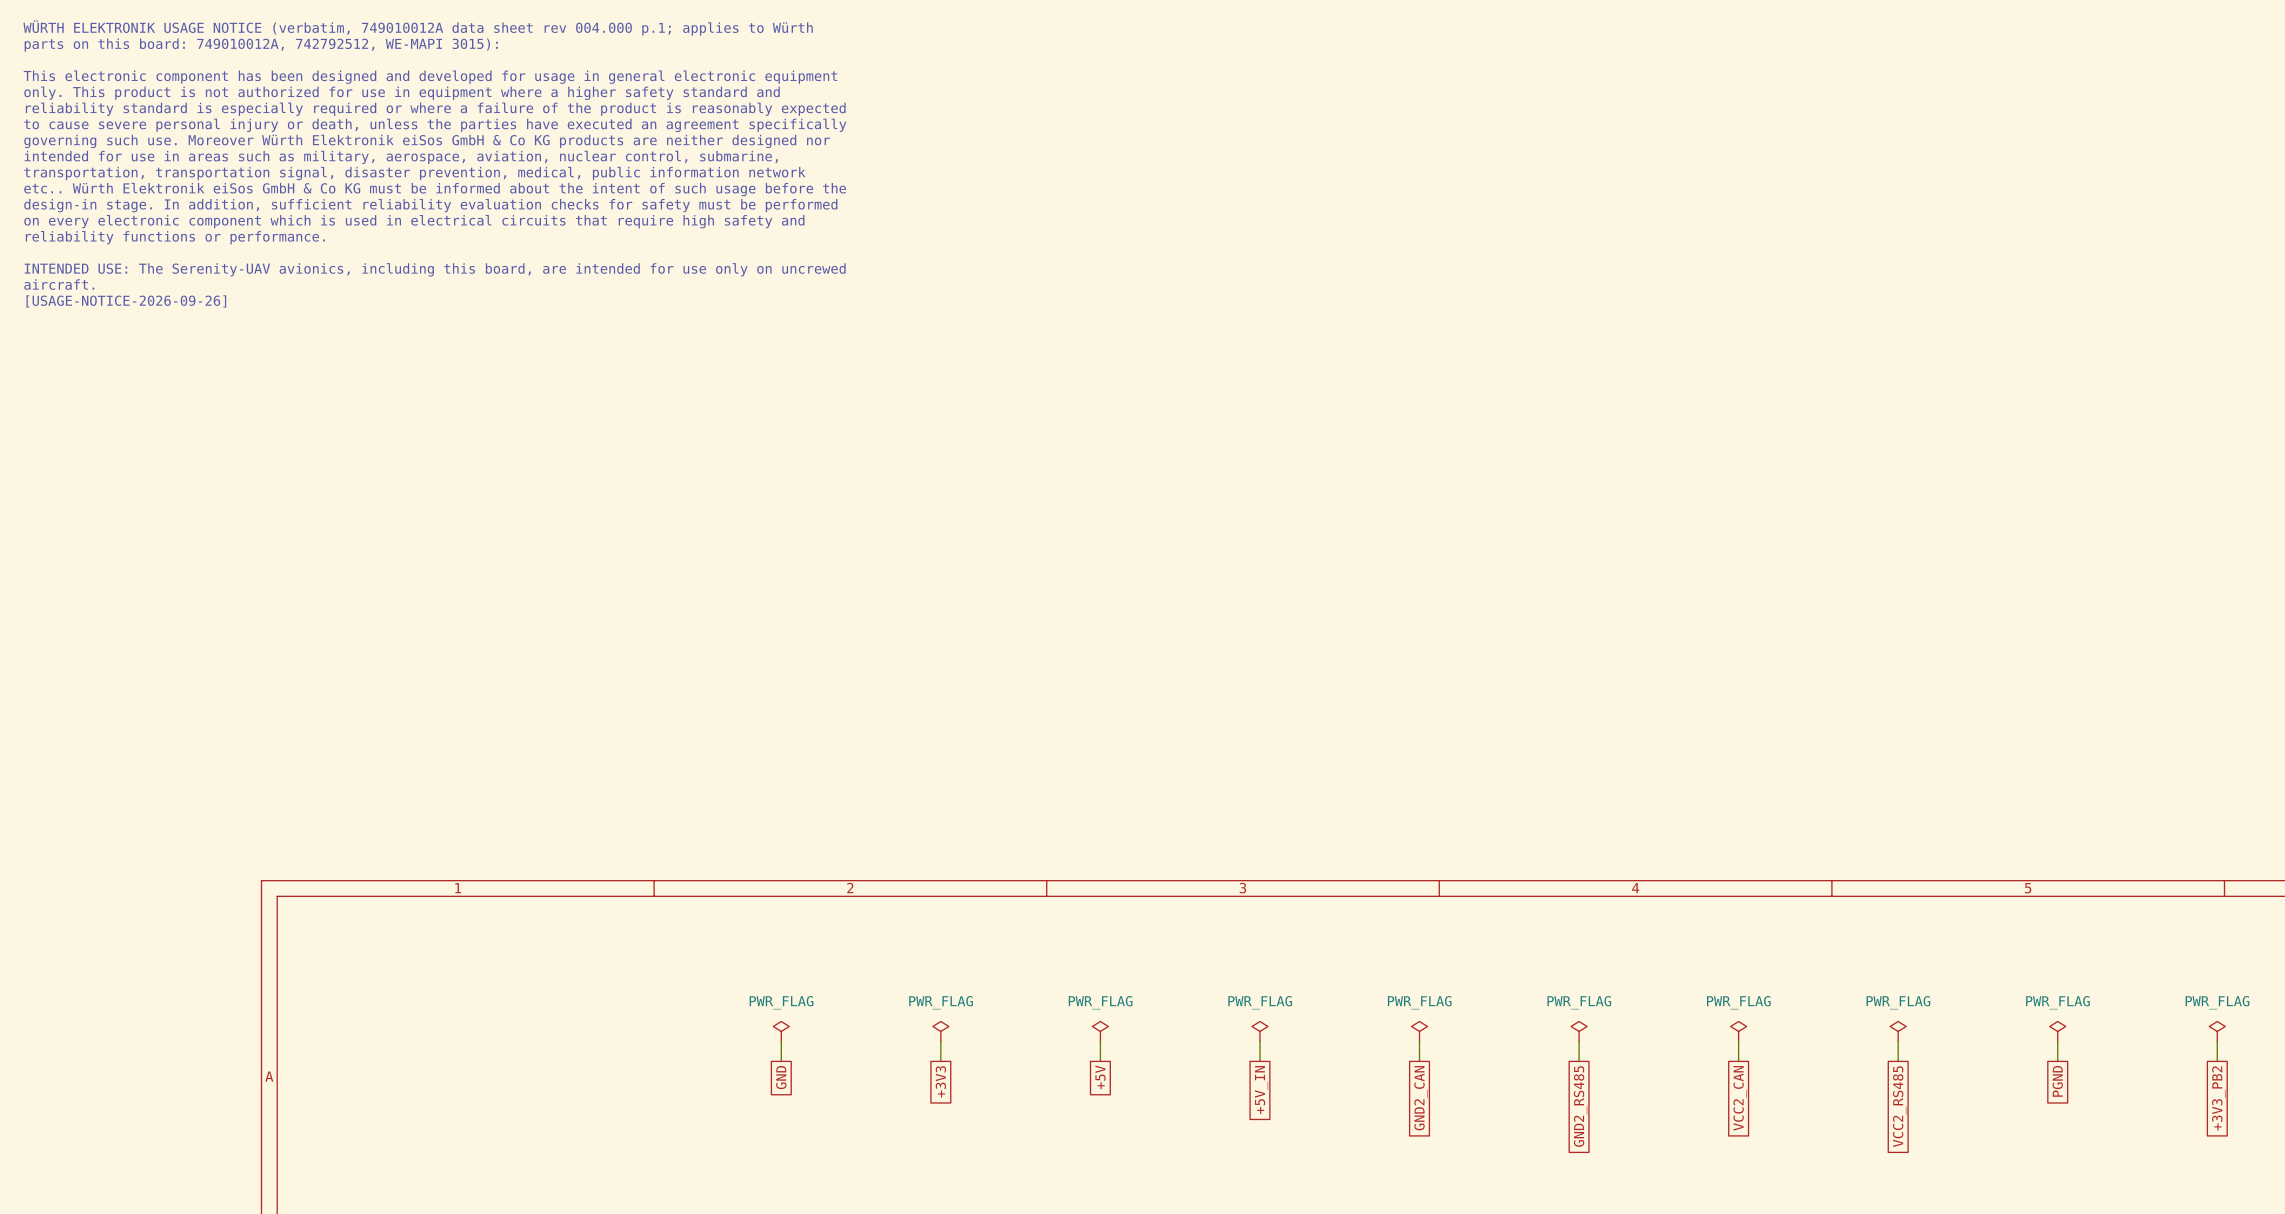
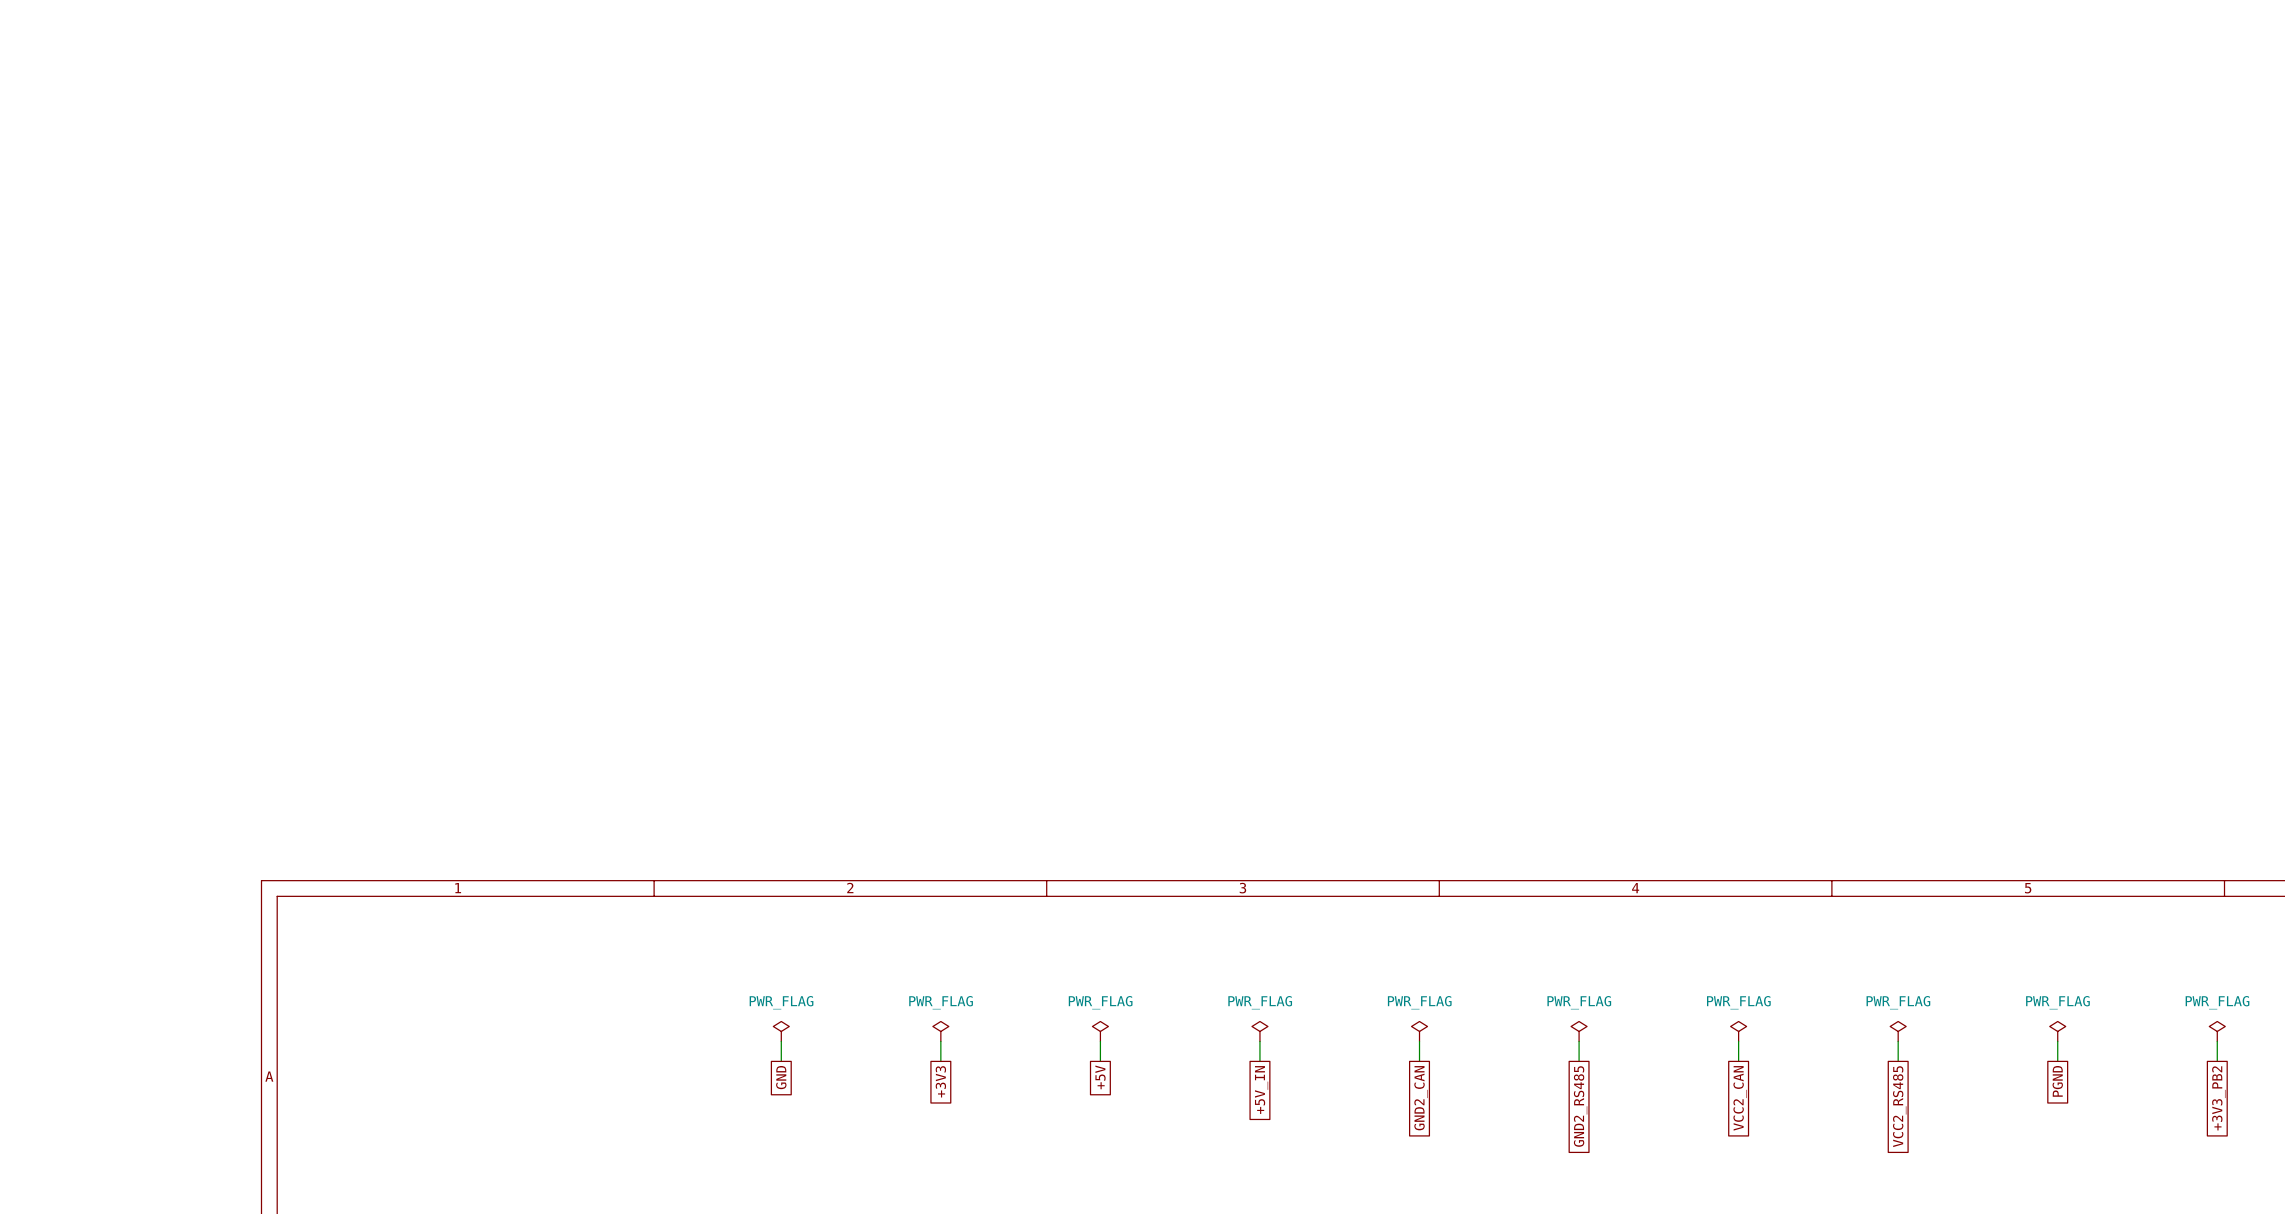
text: WÜRTH ELEKTRONIK USAGE NOTICE (verbatim, 749010012A data sheet rev 004.000 p.1; applies to Würth (418, 27) -> none
text: parts on this board: 749010012A, 742792512, WE-MAPI 3015): (261, 45) -> none
text: This electronic component has been designed and developed for usage in general electronic equipment (430, 77) -> none
text: only. This product is not authorized for use in equipment where a higher safety standard and (402, 93) -> none
text: reliability standard is especially required or where a failure of the product is reasonably expected (435, 109) -> none
text: to cause severe personal injury or death, unless the parties have executed an agreement specifically (435, 125) -> none
text: governing such use. Moreover Würth Elektronik eiSos GmbH & Co KG products are neither designed nor (427, 141) -> none
text: intended for use in areas such as military, aerospace, aviation, nuclear control, submarine, (401, 157) -> none
text: transportation, transportation signal, disaster prevention, medical, public information network (414, 173) -> none
text: etc.. Würth Elektronik eiSos GmbH & Co KG must be informed about the intent of such usage before the (435, 189) -> none
text: design-in stage. In addition, sufficient reliability evaluation checks for safety must be performed (430, 205) -> none
text: on every electronic component which is used in electrical circuits that require high safety and (414, 221) -> none
text: reliability functions or performance. (175, 237) -> none
text: INTENDED USE: The Serenity-UAV avionics, including this board, are intended for use only on uncrewed (435, 269) -> none
text: aircraft. (59, 284) -> none
text: [USAGE-NOTICE-2026-09-26] (126, 301) -> none

